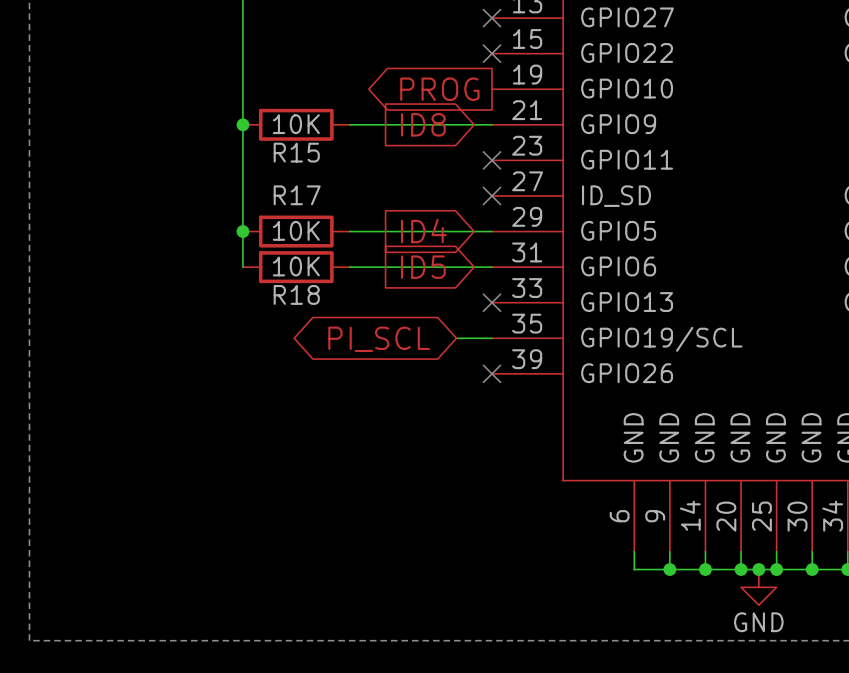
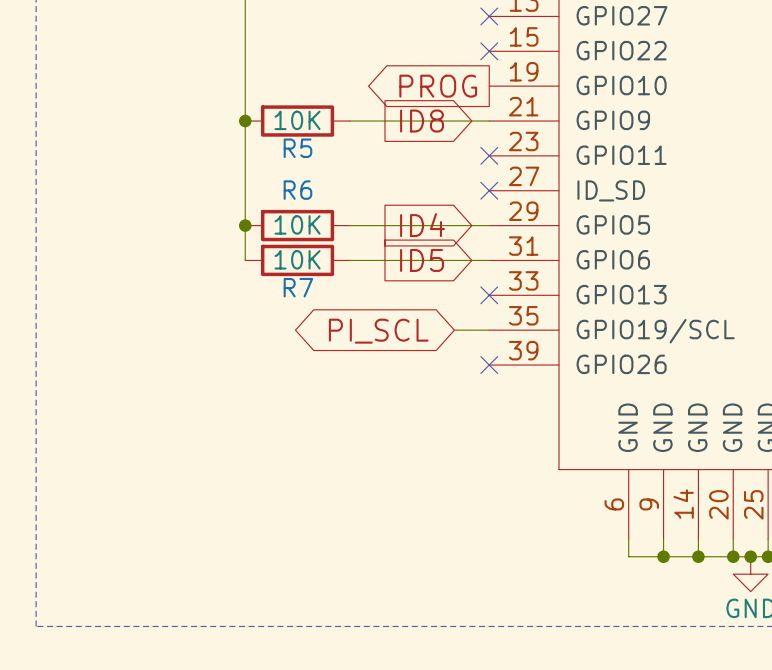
R15 name: R15 (296, 152) -> R5 (297, 148)
R17 name: R17 (297, 195) -> R6 (297, 190)
R18 name: R18 (296, 294) -> R7 (298, 287)

